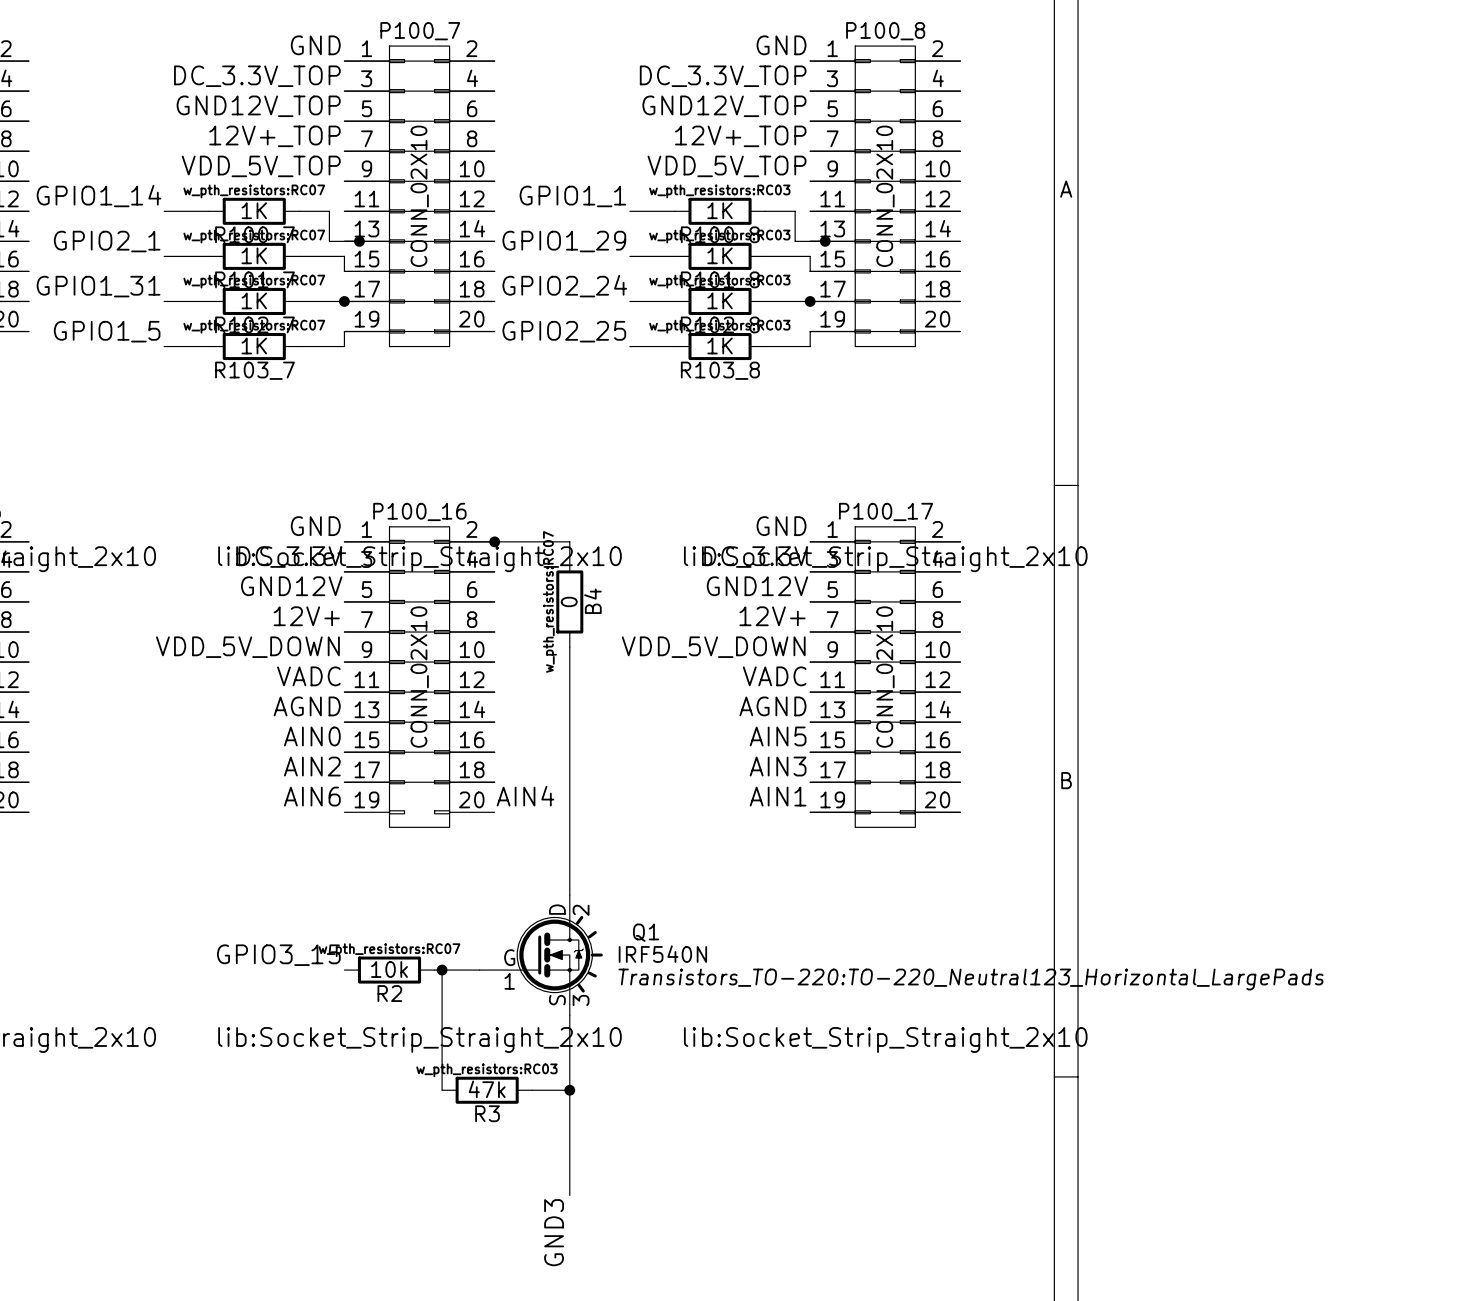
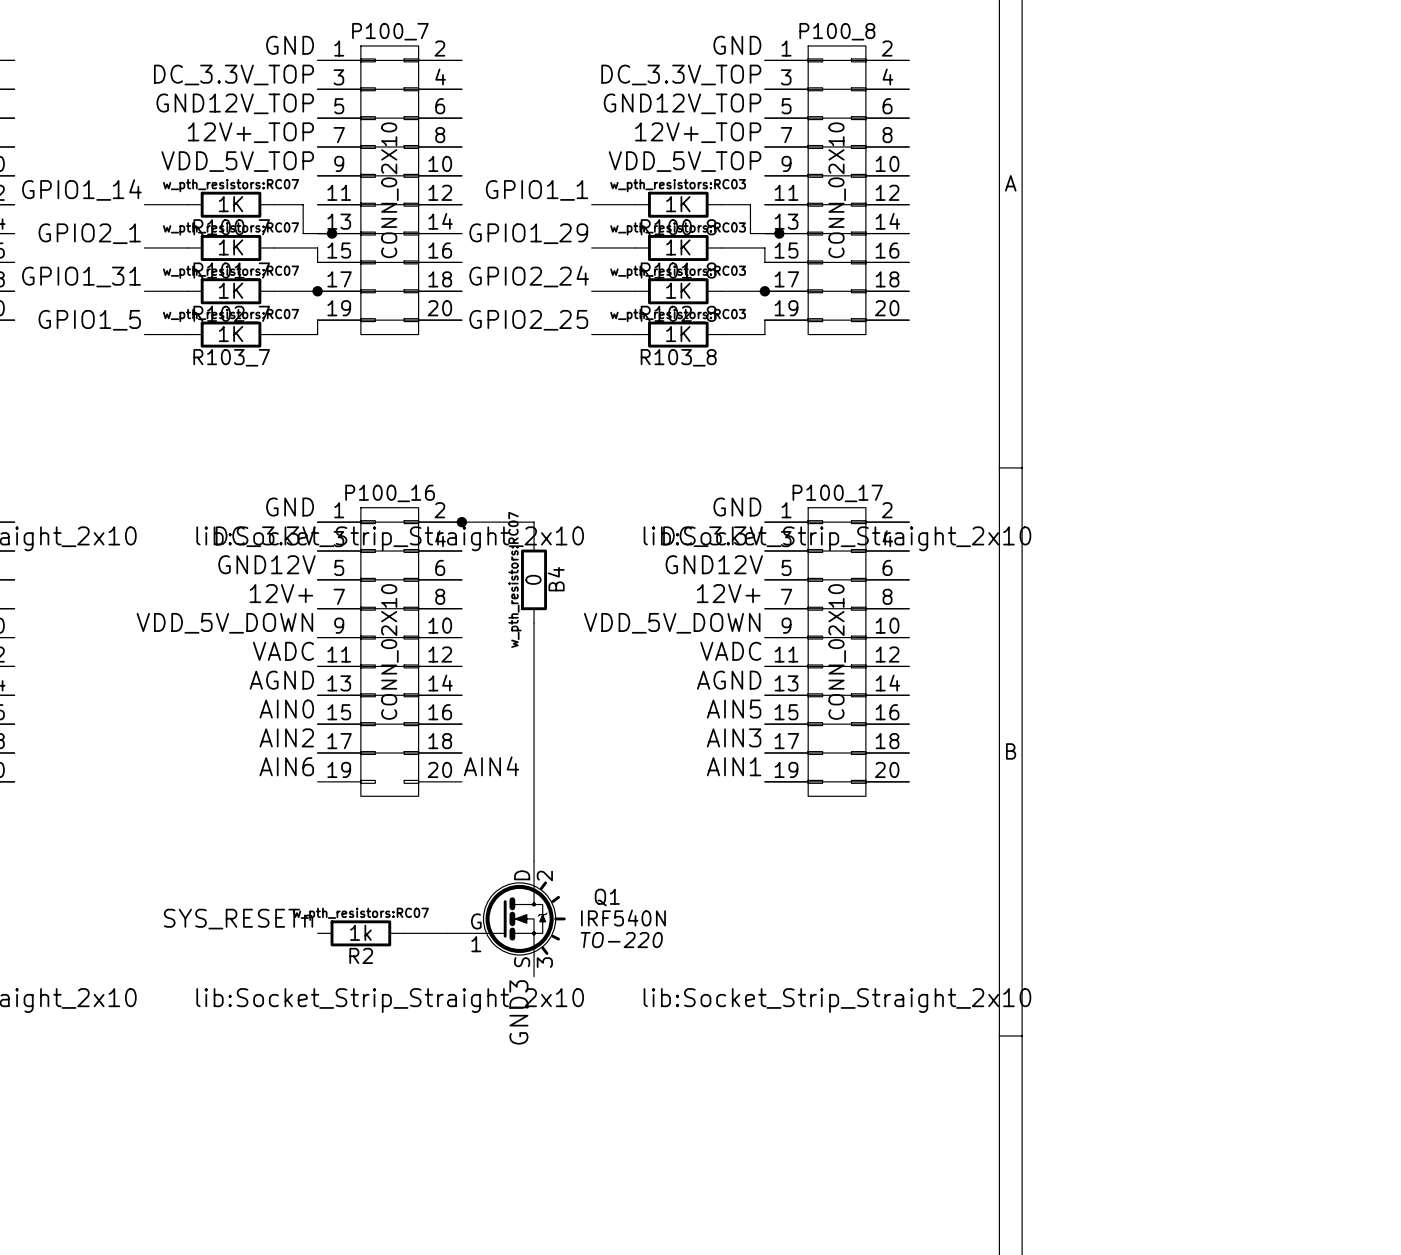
label: GPIO3_15 (278, 955) -> SYS_RESETn (238, 919)
R2 value: 10k (389, 969) -> 1k (360, 932)
wire: (442, 970) (442, 1090) -> none
junction: (442, 970) -> none
Q1 text: Transistors_TO-220:TO-220_Neutral123_Horizontal_LargePads (971, 979) -> TO-220 (621, 940)
wire: (569, 1015) (569, 1195) -> none
R3: 47k (487, 1090) -> none
wire: (532, 1090) (569, 1090) -> none
junction: (569, 1090) -> none
label position: GND3 (554, 1232) -> GND3 (518, 1012)

